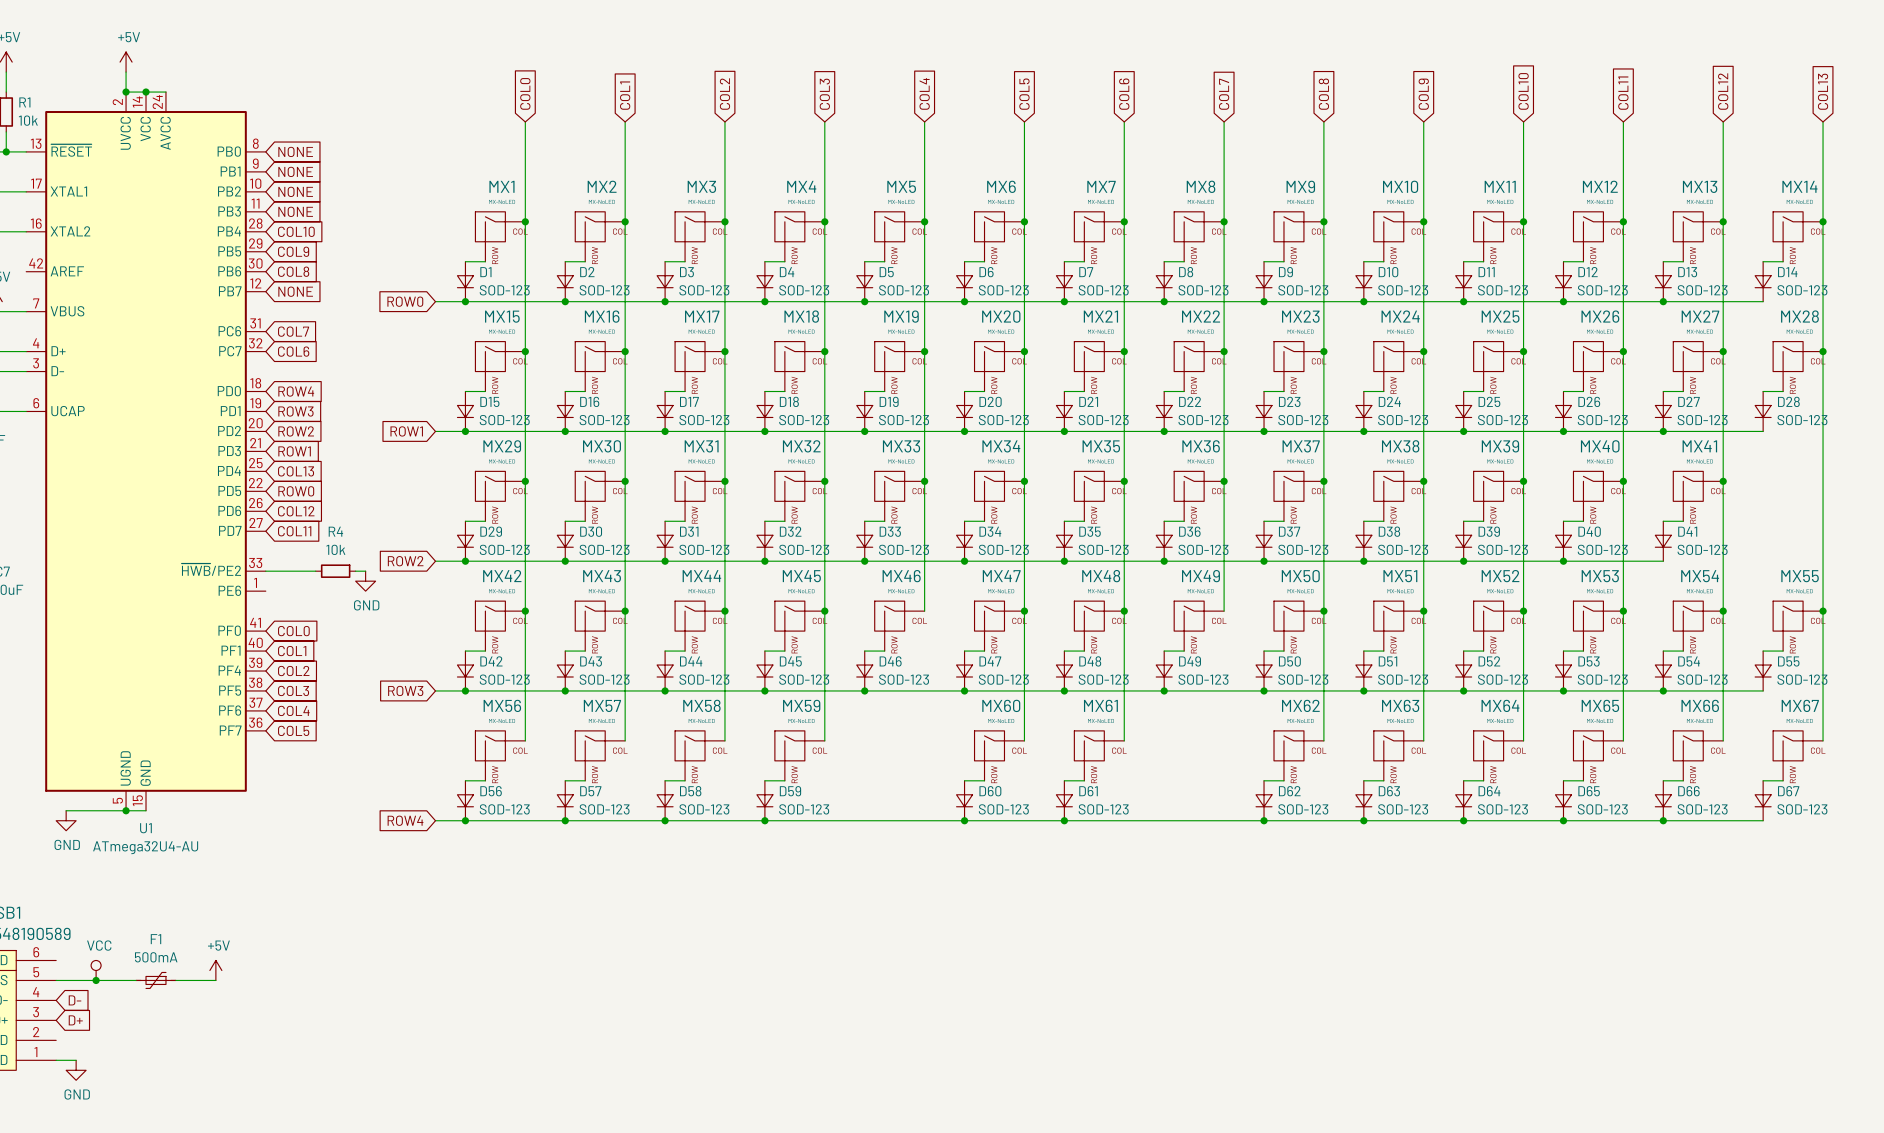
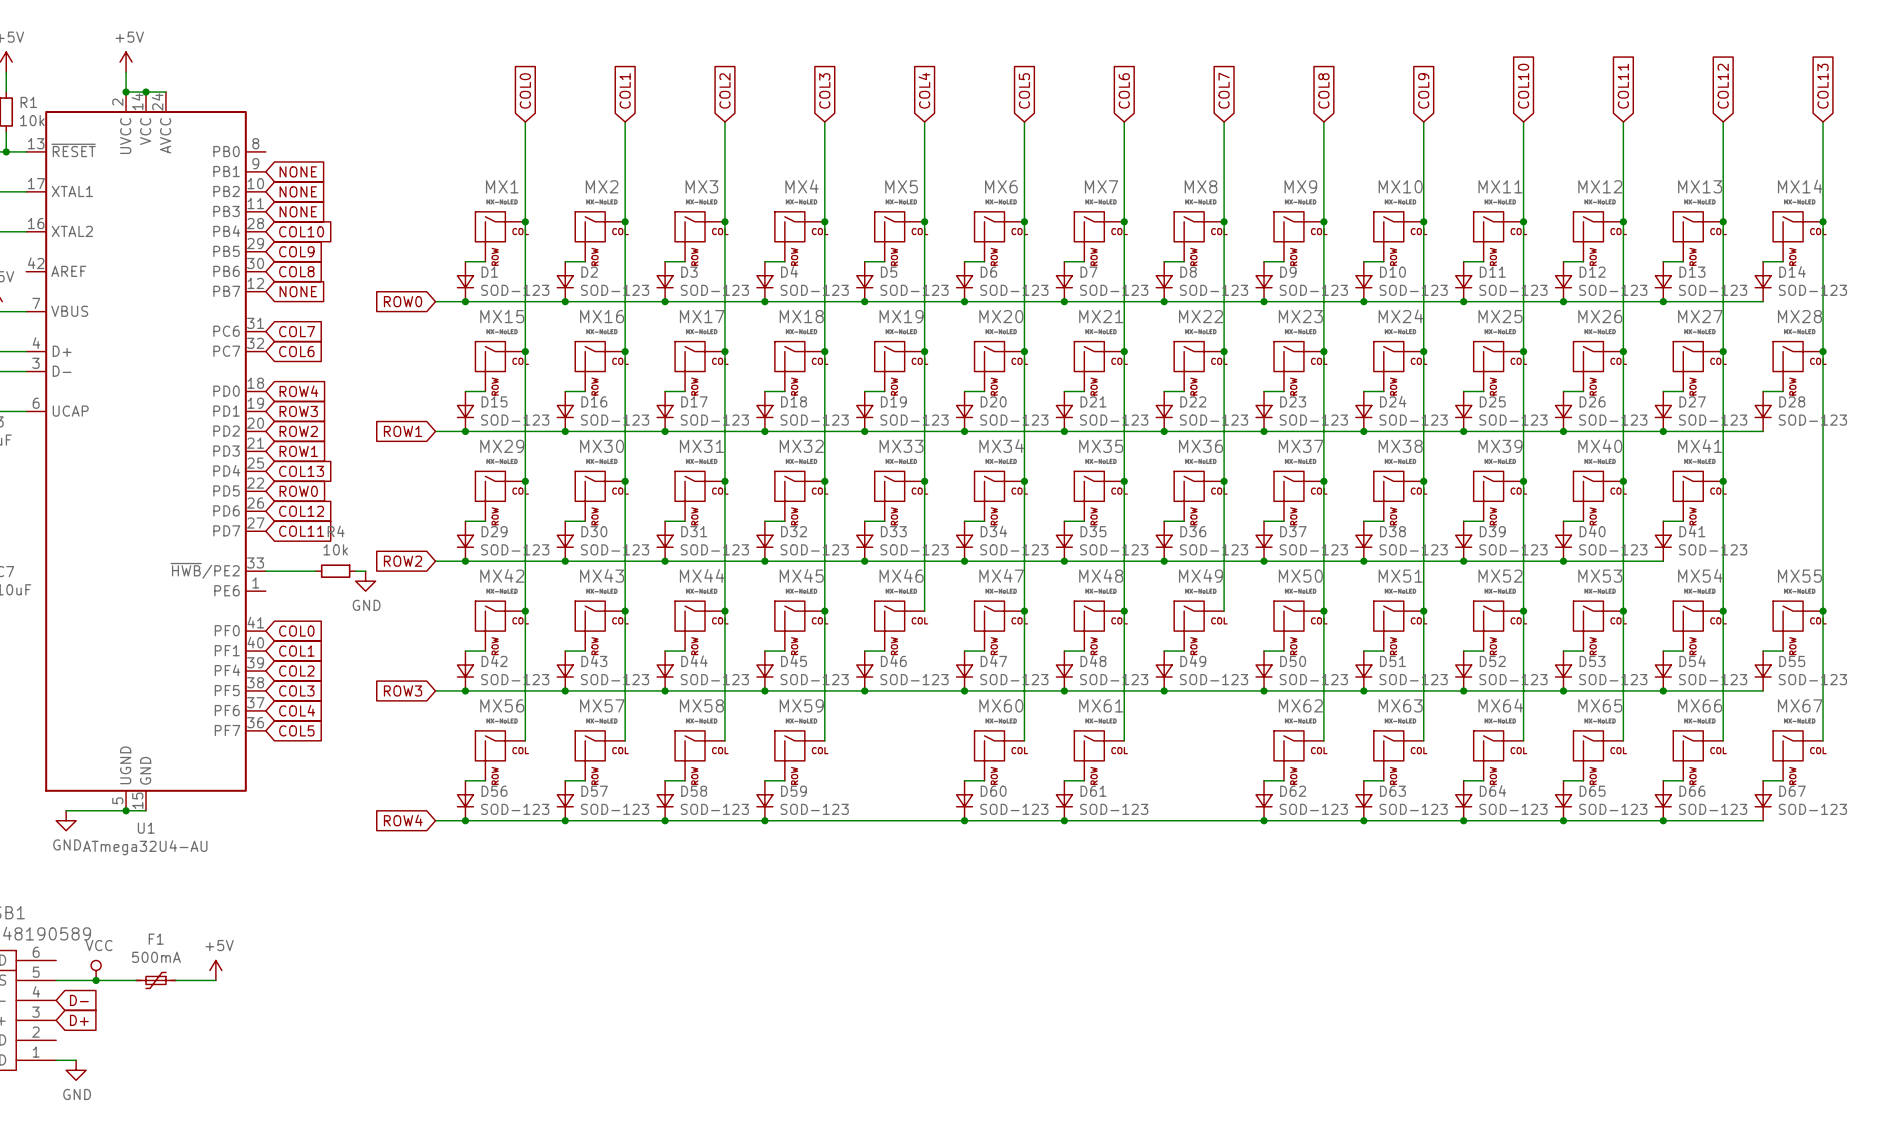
global label: NONE (295, 151) -> none

